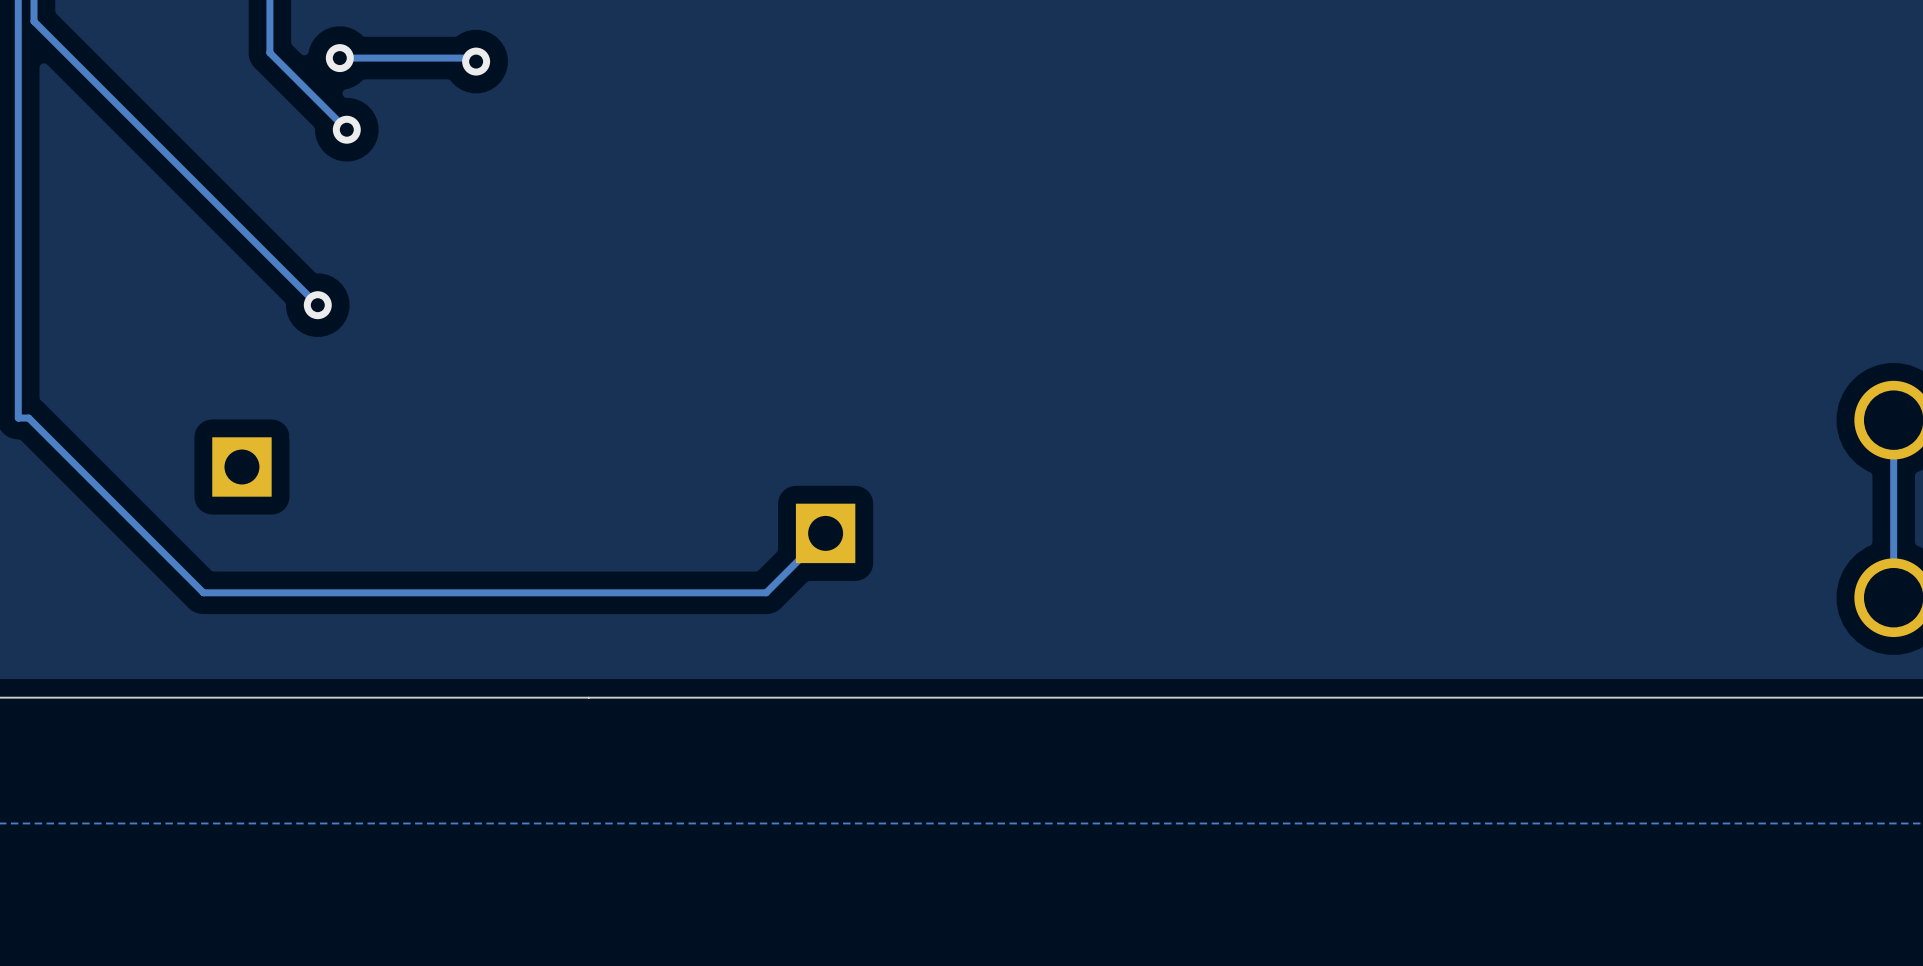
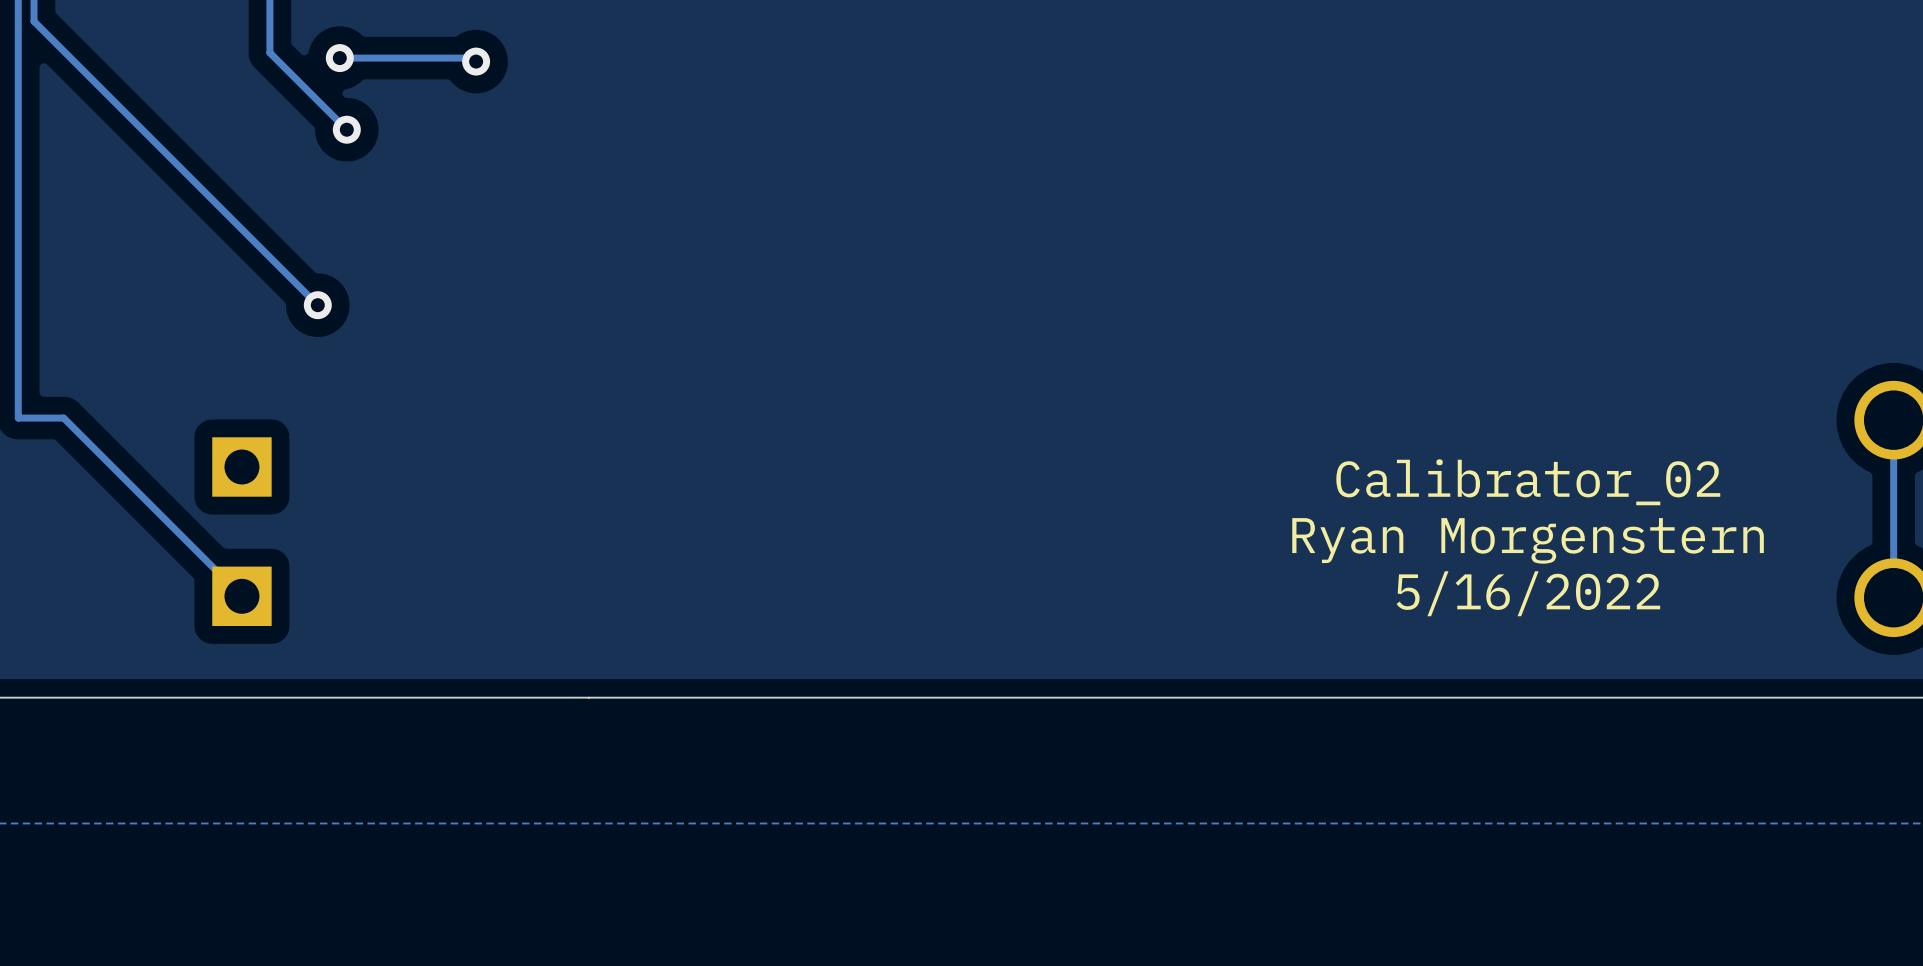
track: (28, 418) (203, 592) (766, 592) (825, 533) -> (28, 418) (63, 418) (241, 596)
text: none -> Calibrator_02 (1528, 482)
part position: (825, 533) -> (241, 596)
text: none -> Ryan Morgenstern (1528, 540)
text: none -> 5/16/2022 (1528, 593)

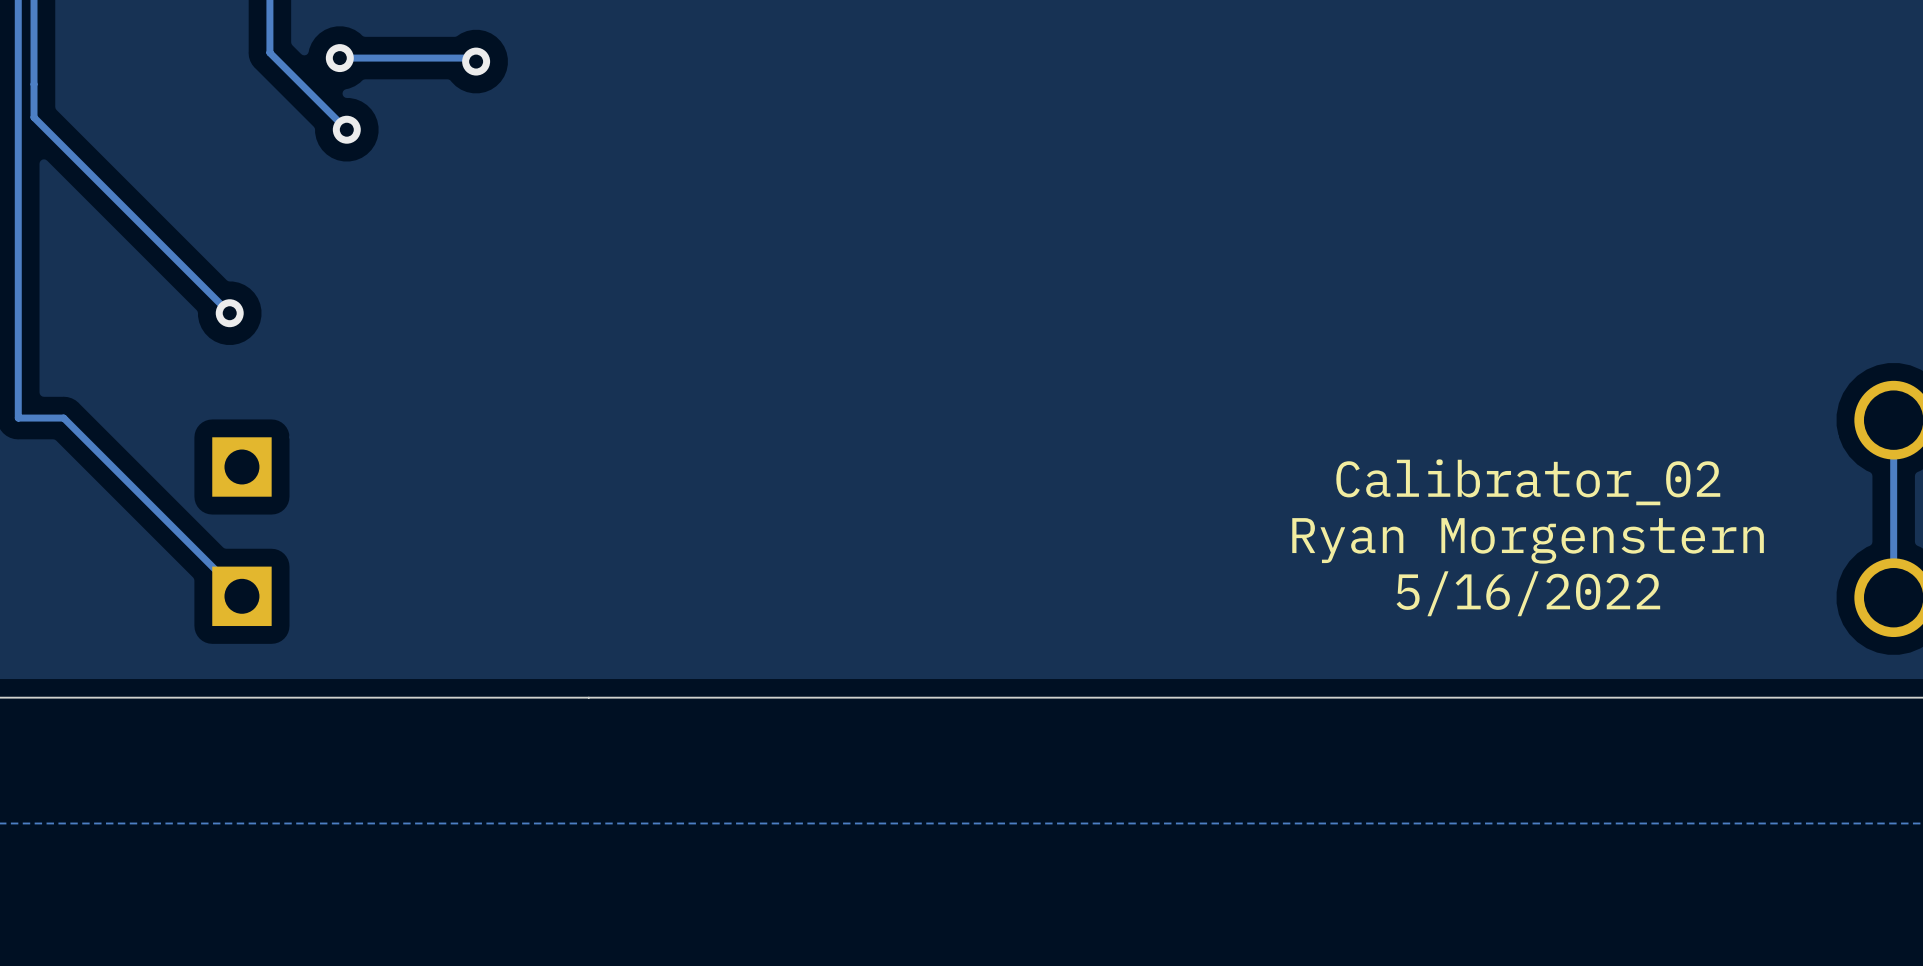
track: (34, 21) (317, 305) -> (34, 21) (34, 117) (229, 313)
via position: (317, 305) -> (229, 313)

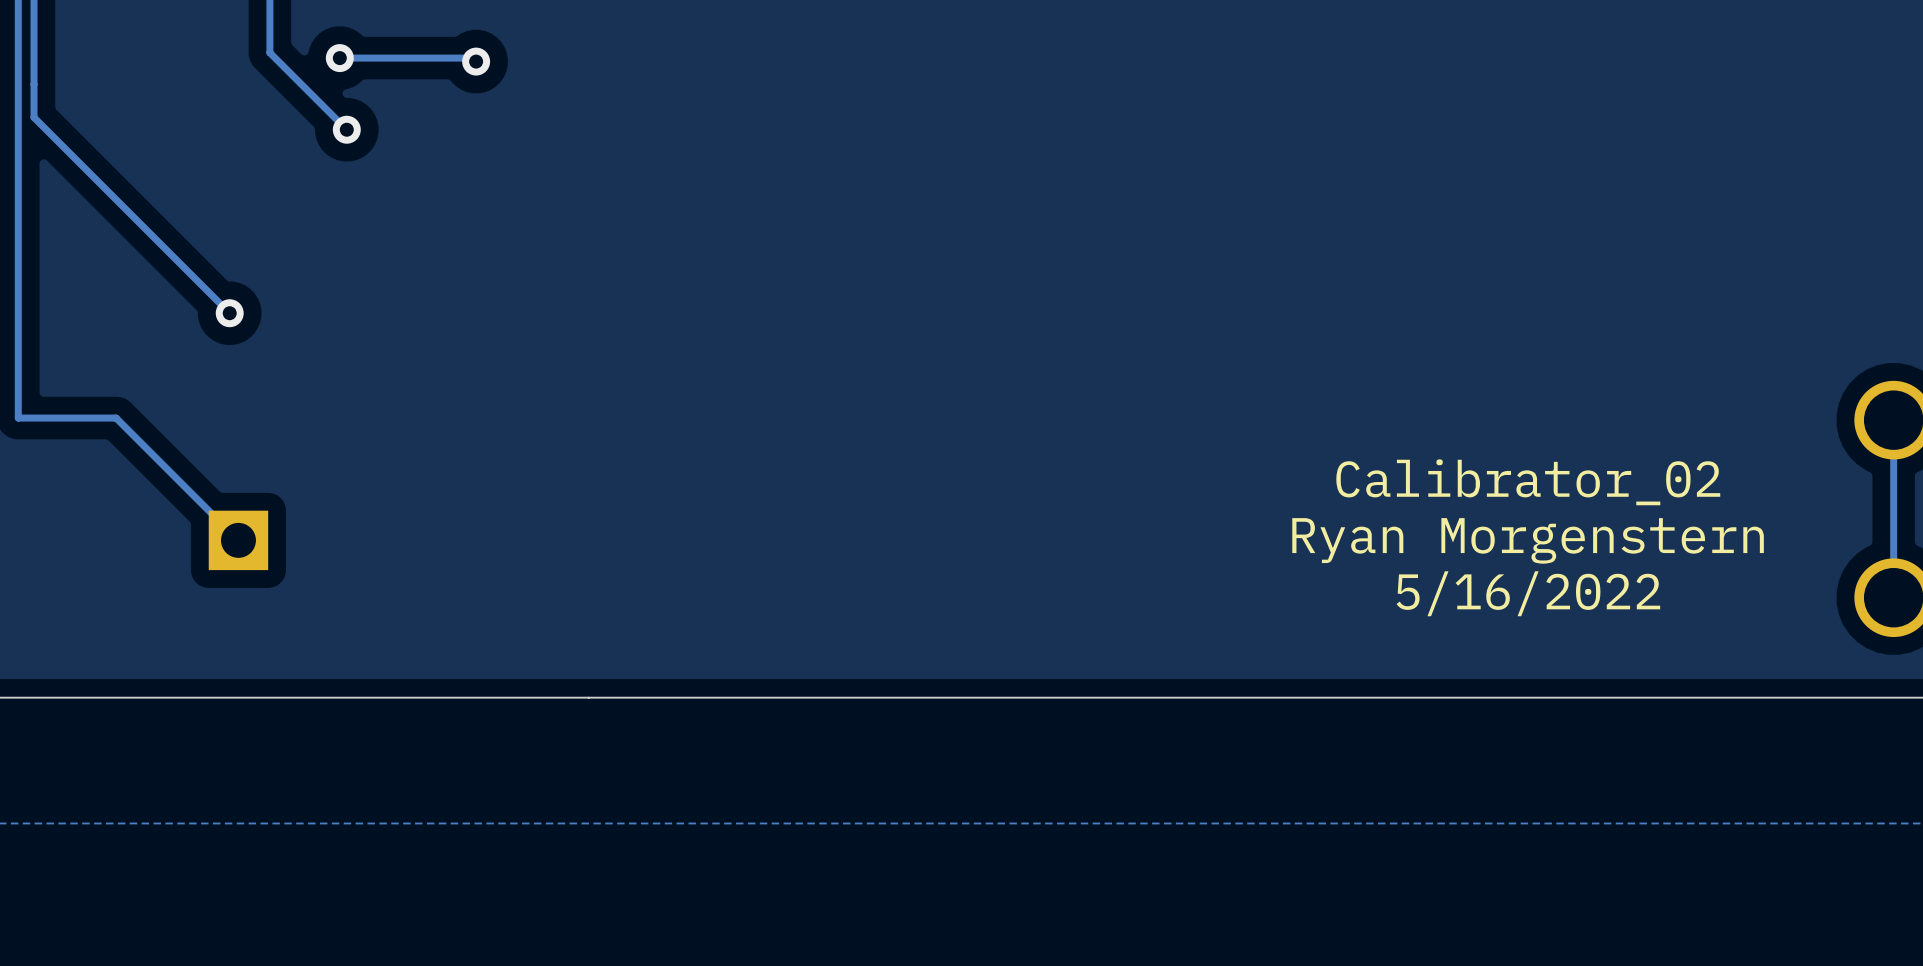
track: (63, 418) (241, 596) -> (63, 418) (116, 418) (238, 540)
part: (241, 466) -> none
part: none -> (238, 540)
part: (241, 596) -> none

